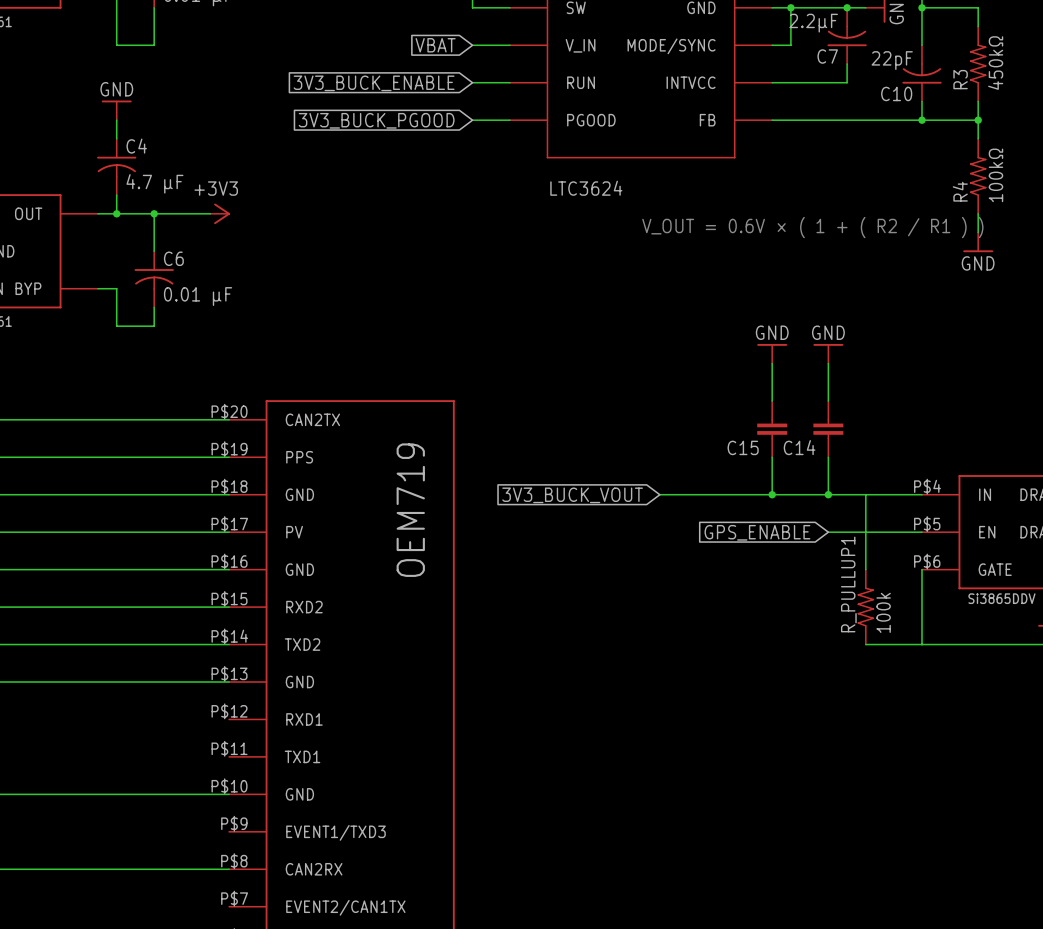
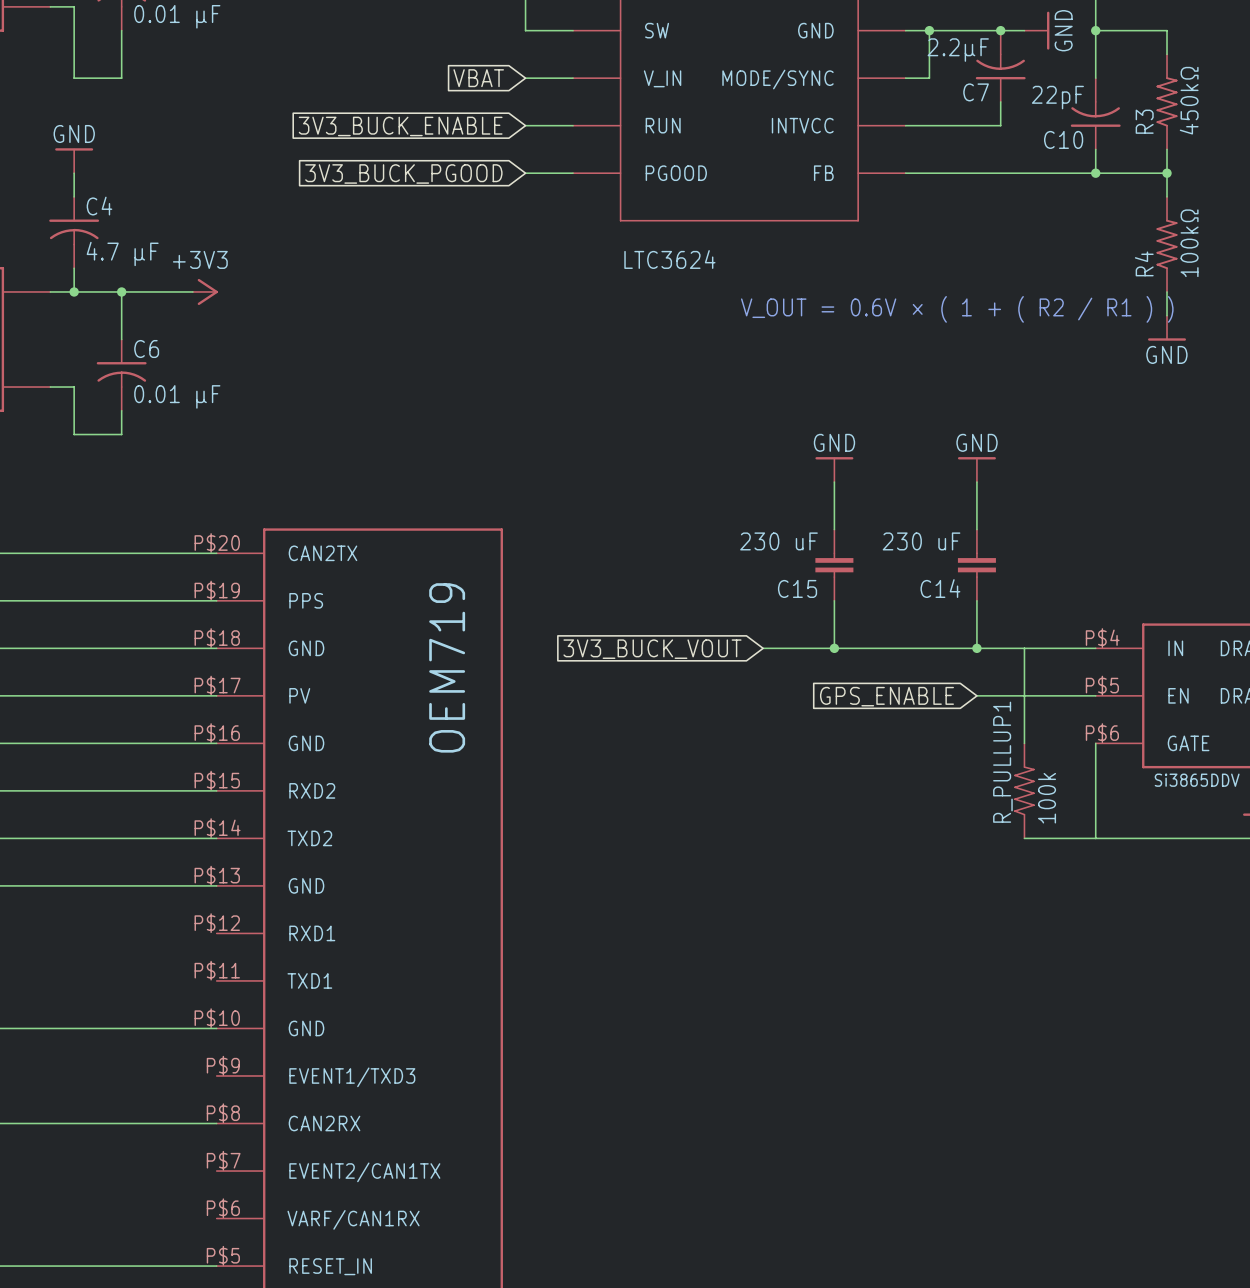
power symbol position: GND (772, 353) -> GND (834, 469)
wire: (772, 363) (772, 401) -> (834, 482) (834, 529)
C15 value: none -> 230 uF (778, 541)
C14 value: none -> 230 uF (921, 541)
C15 position: (772, 429) -> (834, 565)
wire: (772, 457) (772, 494) -> (834, 600) (834, 648)
junction: none -> (834, 648)
junction: (772, 494) -> none

